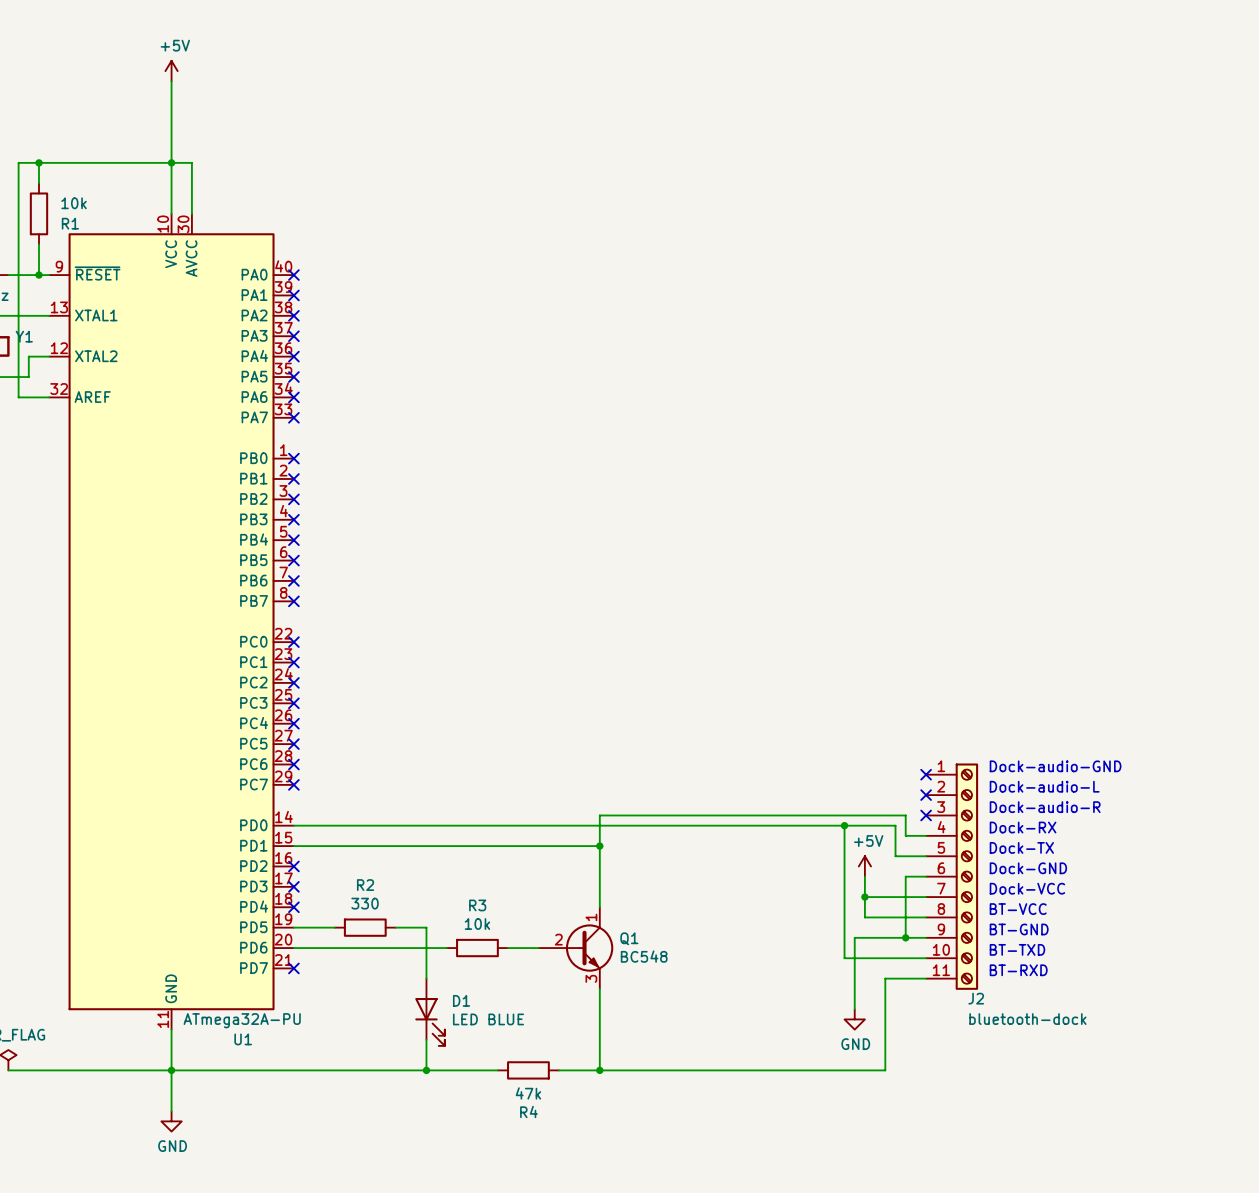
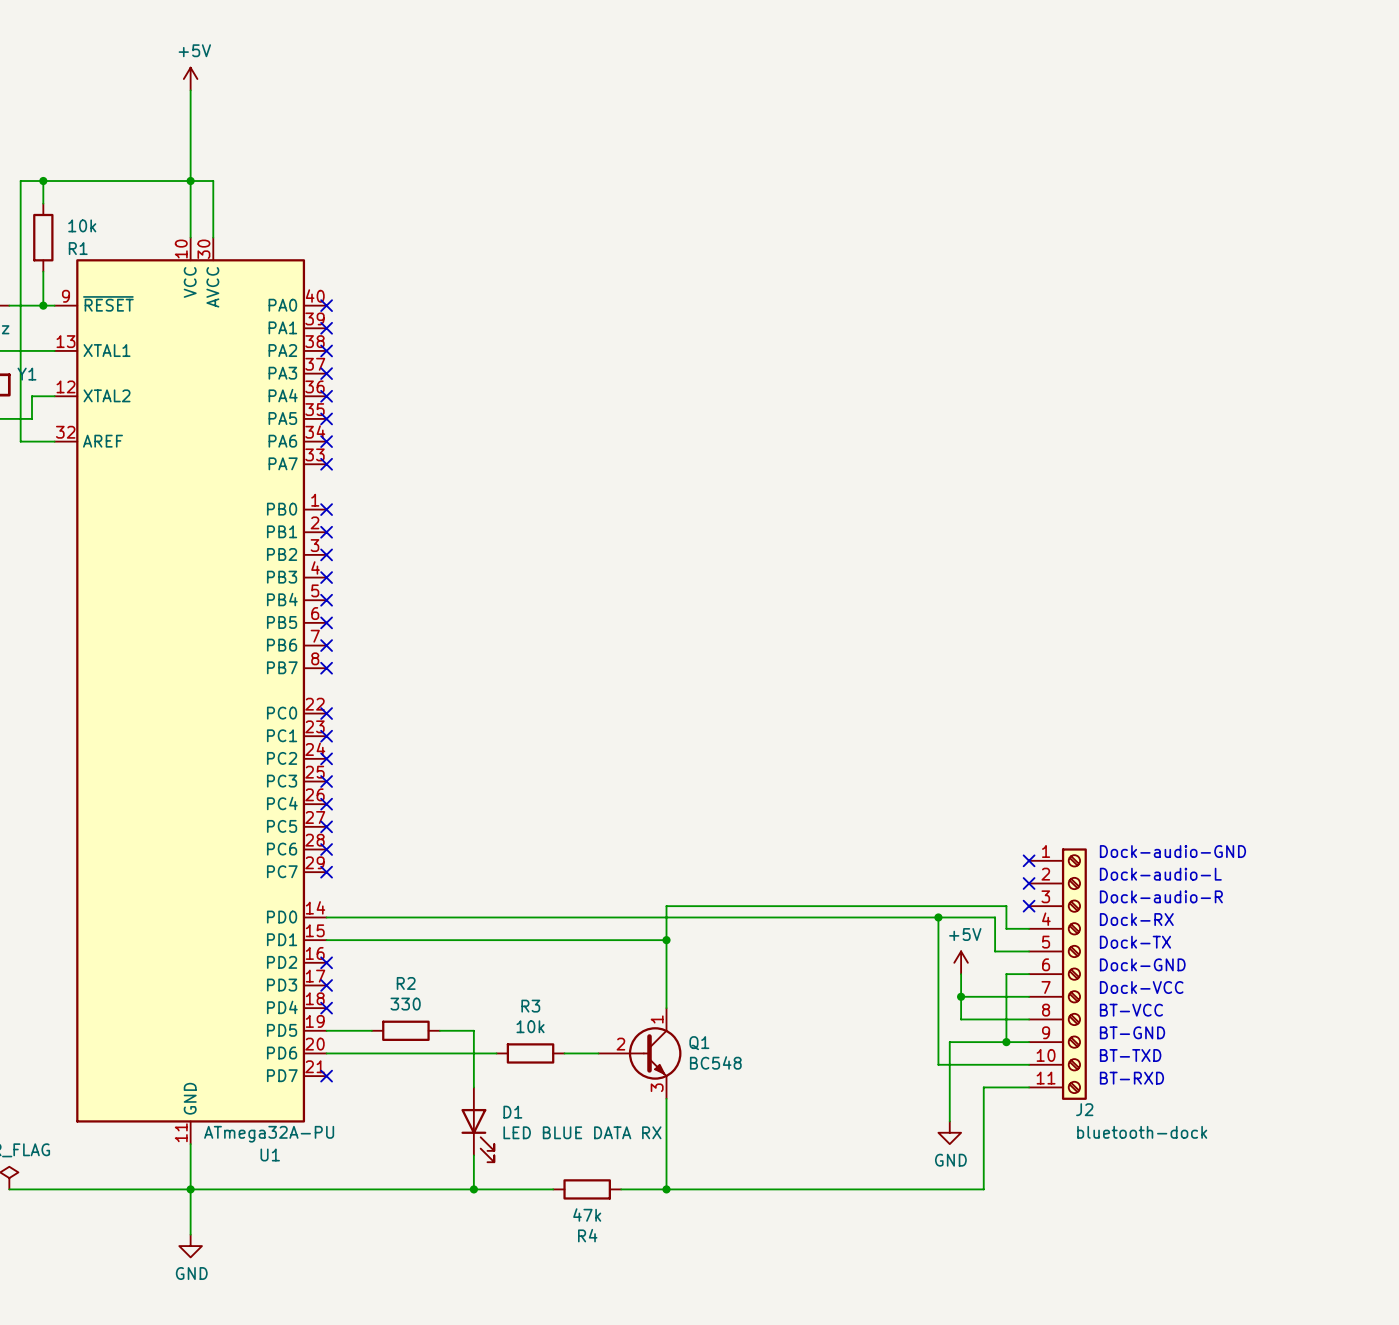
D1 value: LED BLUE (488, 1019) -> LED BLUE DATA RX (582, 1132)

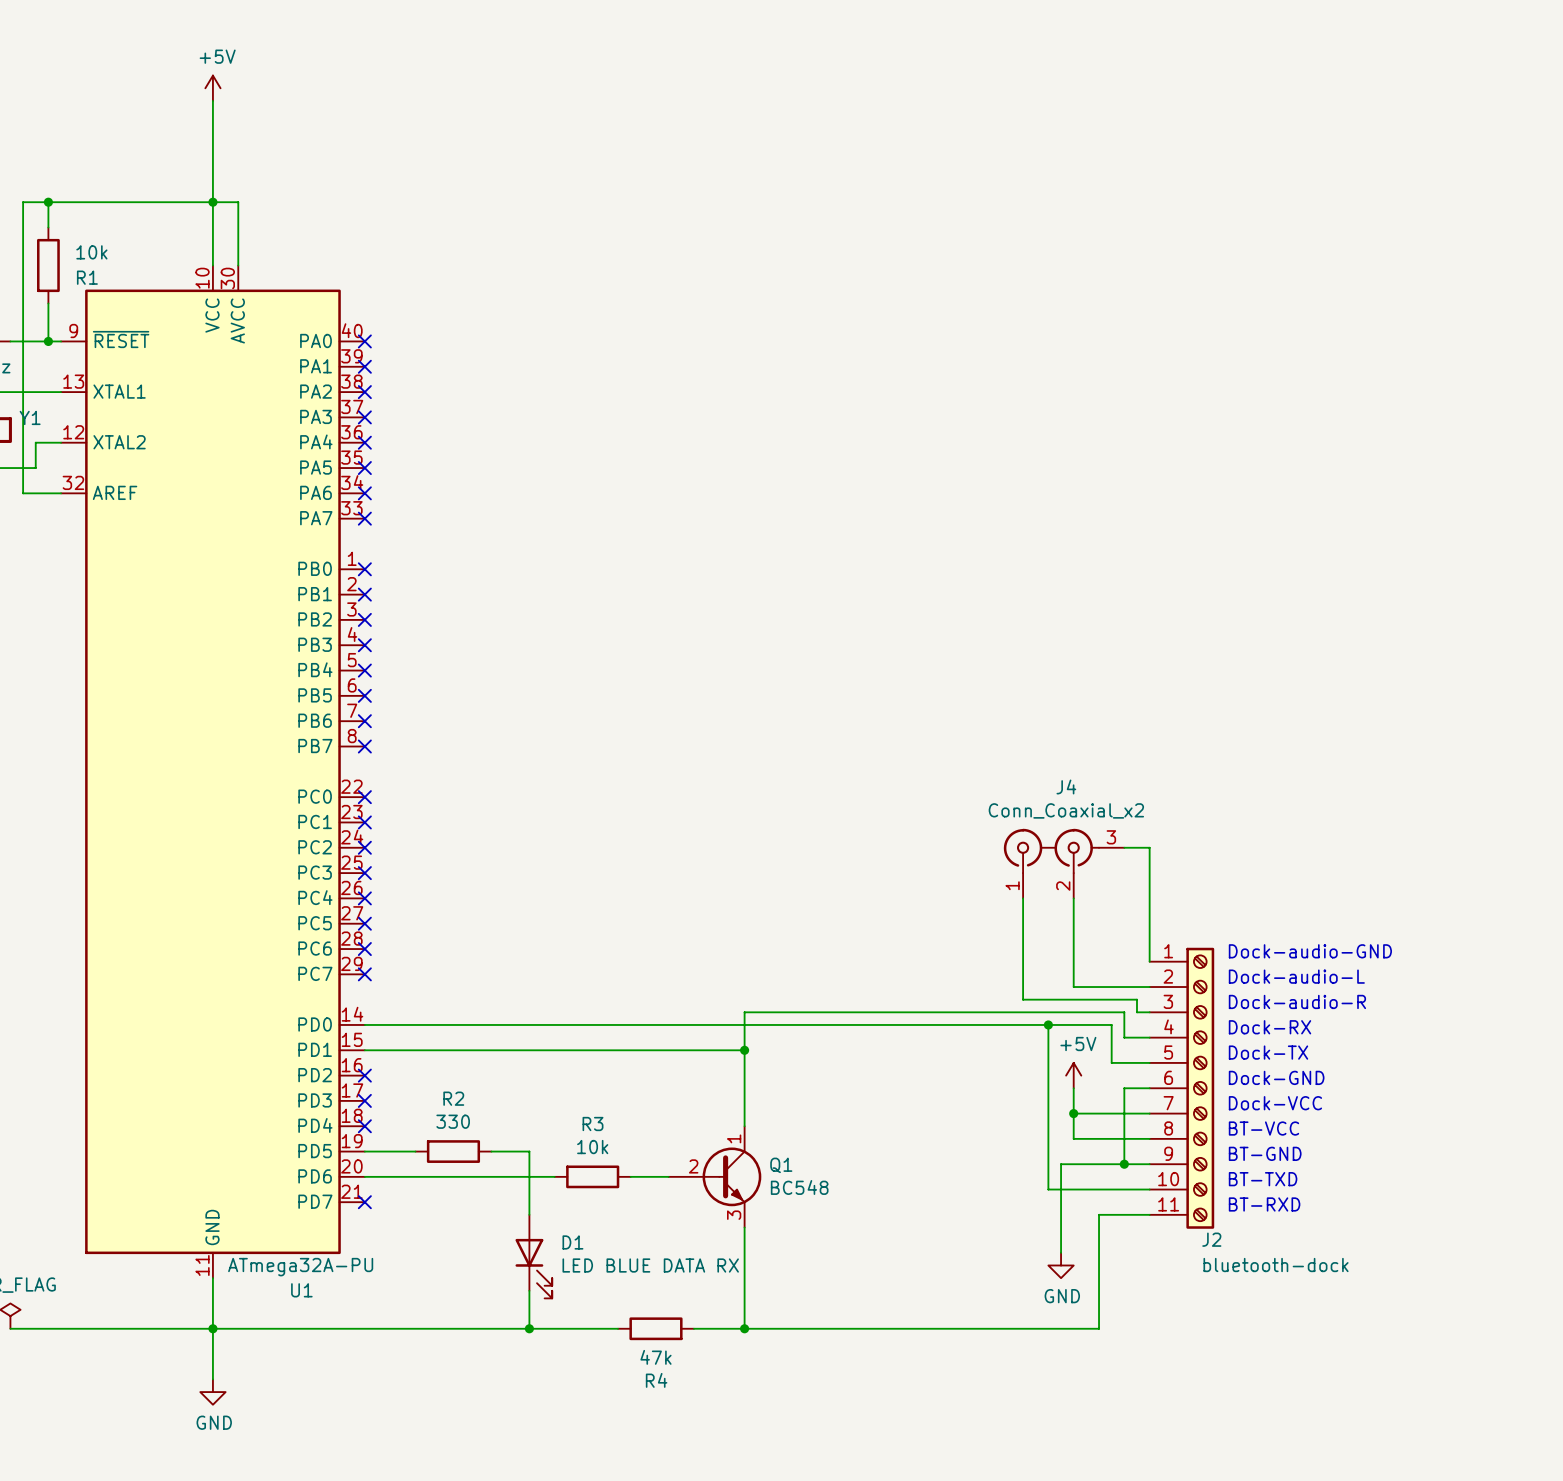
wire: none -> (1124, 847) (1149, 847) (1149, 961)
J4: none -> Conn_Coaxial_x2 (1064, 863)
wire: none -> (1023, 898) (1023, 999) (1136, 999) (1136, 1012) (1149, 1012)
wire: none -> (1073, 898) (1073, 987) (1149, 987)
no-connect mark: (1029, 860) -> none
no-connect mark: (1029, 883) -> none
no-connect mark: (1029, 906) -> none

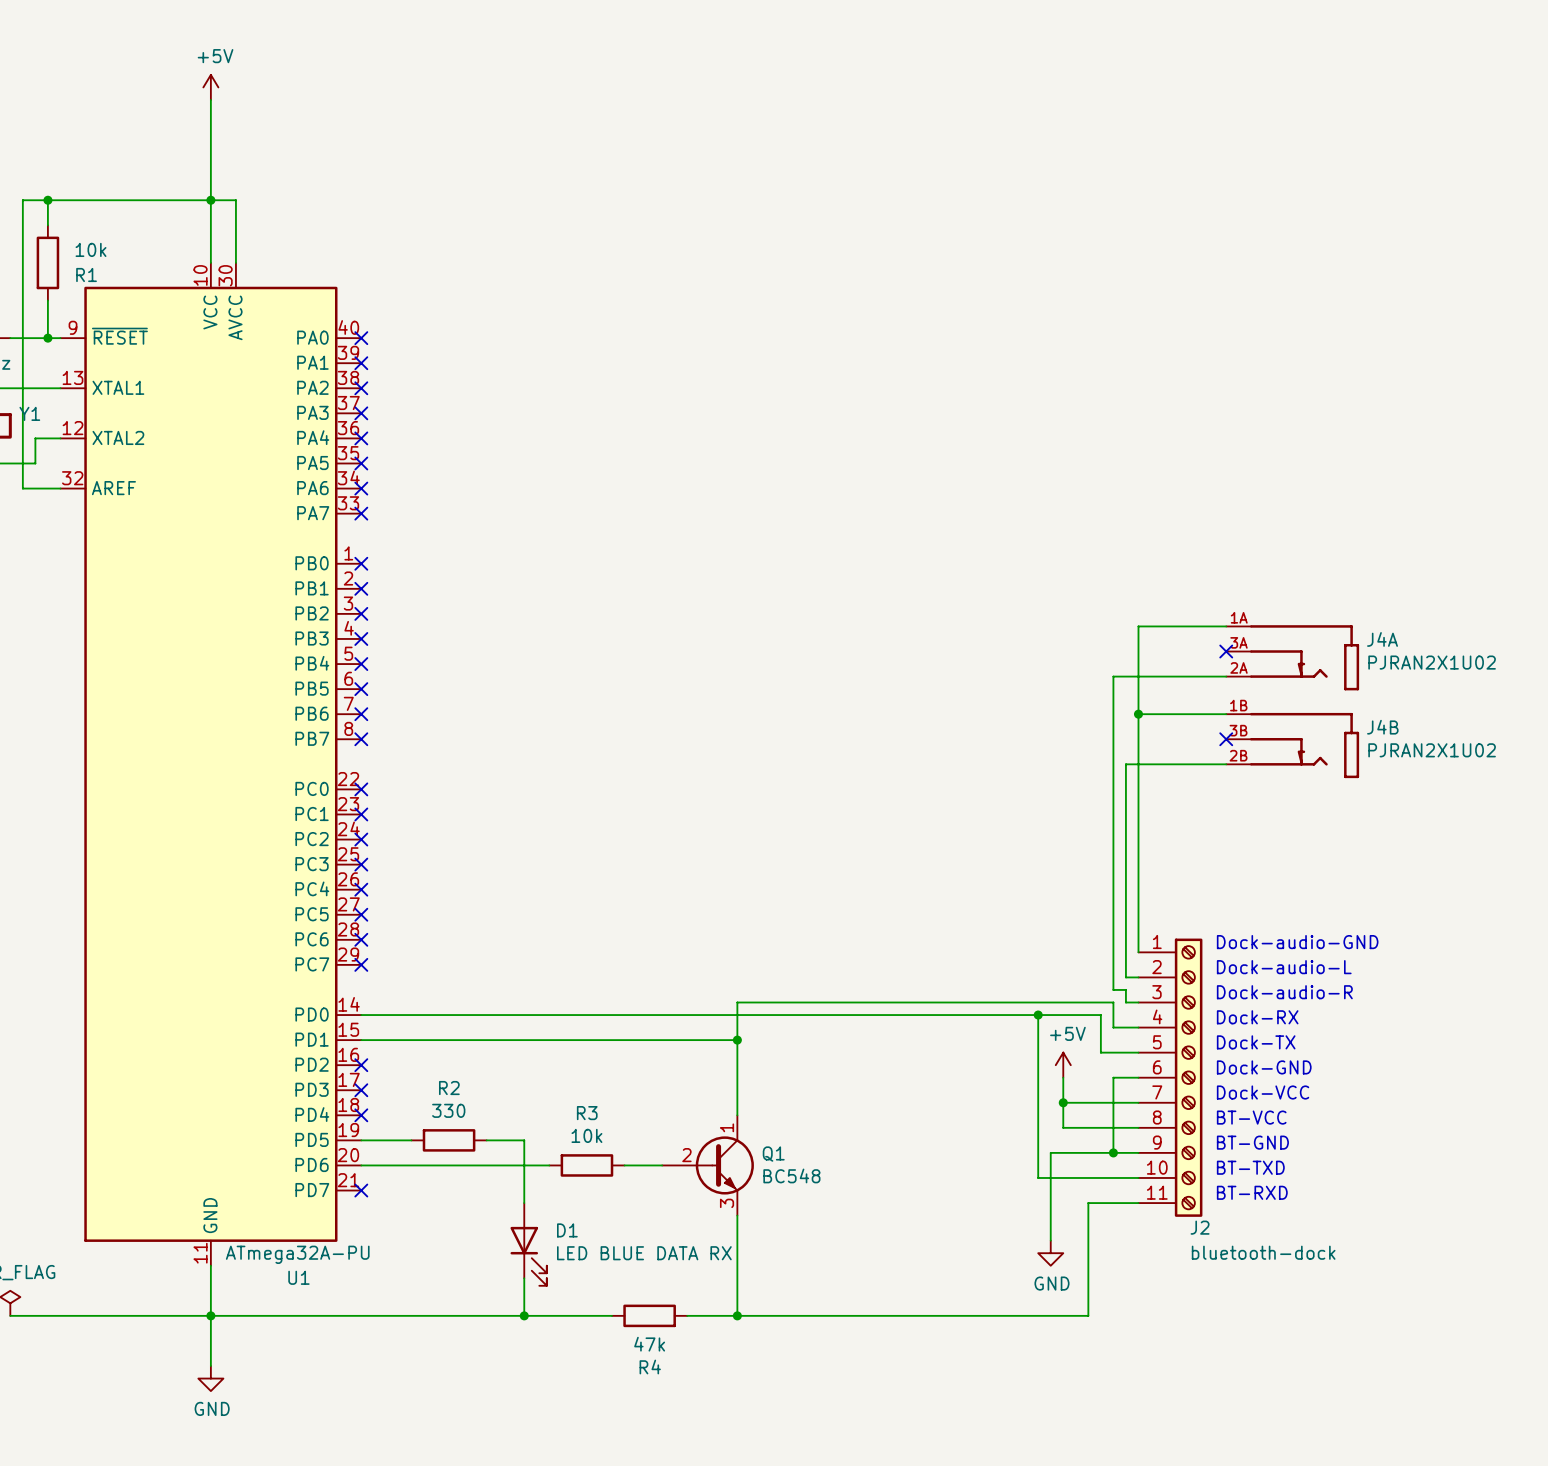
no-connect mark: none -> (1226, 651)
J4A: none -> PJRAN2X1U02 (1292, 657)
wire: none -> (1138, 714) (1226, 714)
junction: none -> (1138, 714)
no-connect mark: none -> (1226, 739)
J4B: none -> PJRAN2X1U02 (1292, 745)
wire: (1124, 847) (1149, 847) -> (1226, 626) (1138, 626) (1138, 839)
J4: Conn_Coaxial_x2 (1064, 863) -> none
wire: (1023, 898) (1023, 999) (1124, 999) -> (1226, 676) (1113, 676) (1113, 989)
wire: (1073, 898) (1073, 987) (1136, 987) -> (1226, 764) (1125, 764) (1125, 977)

